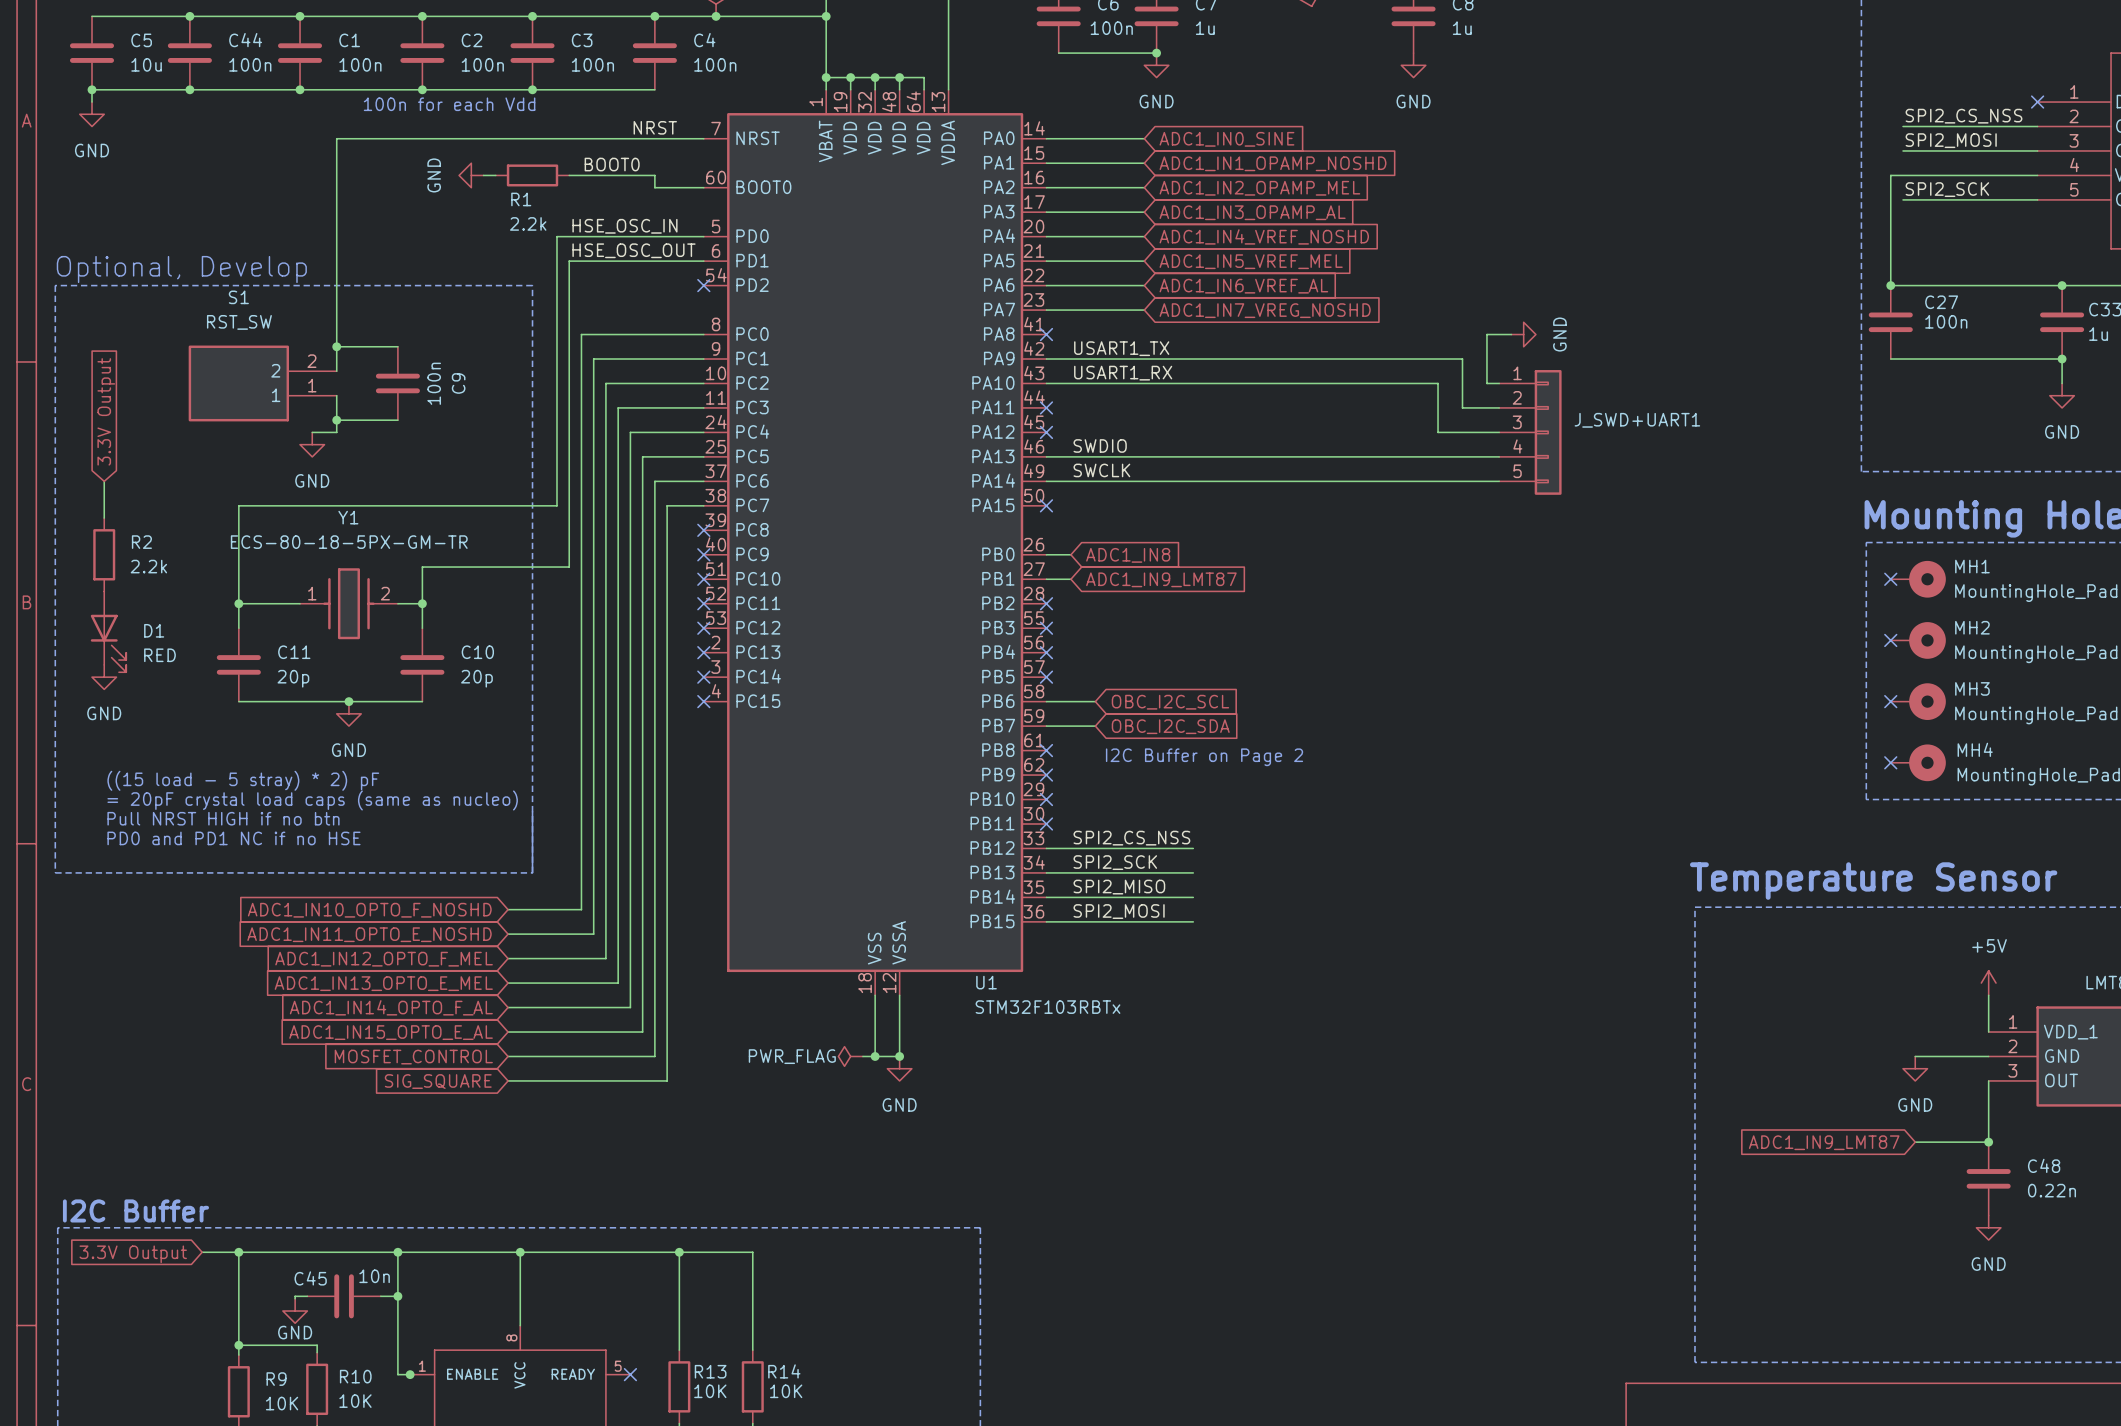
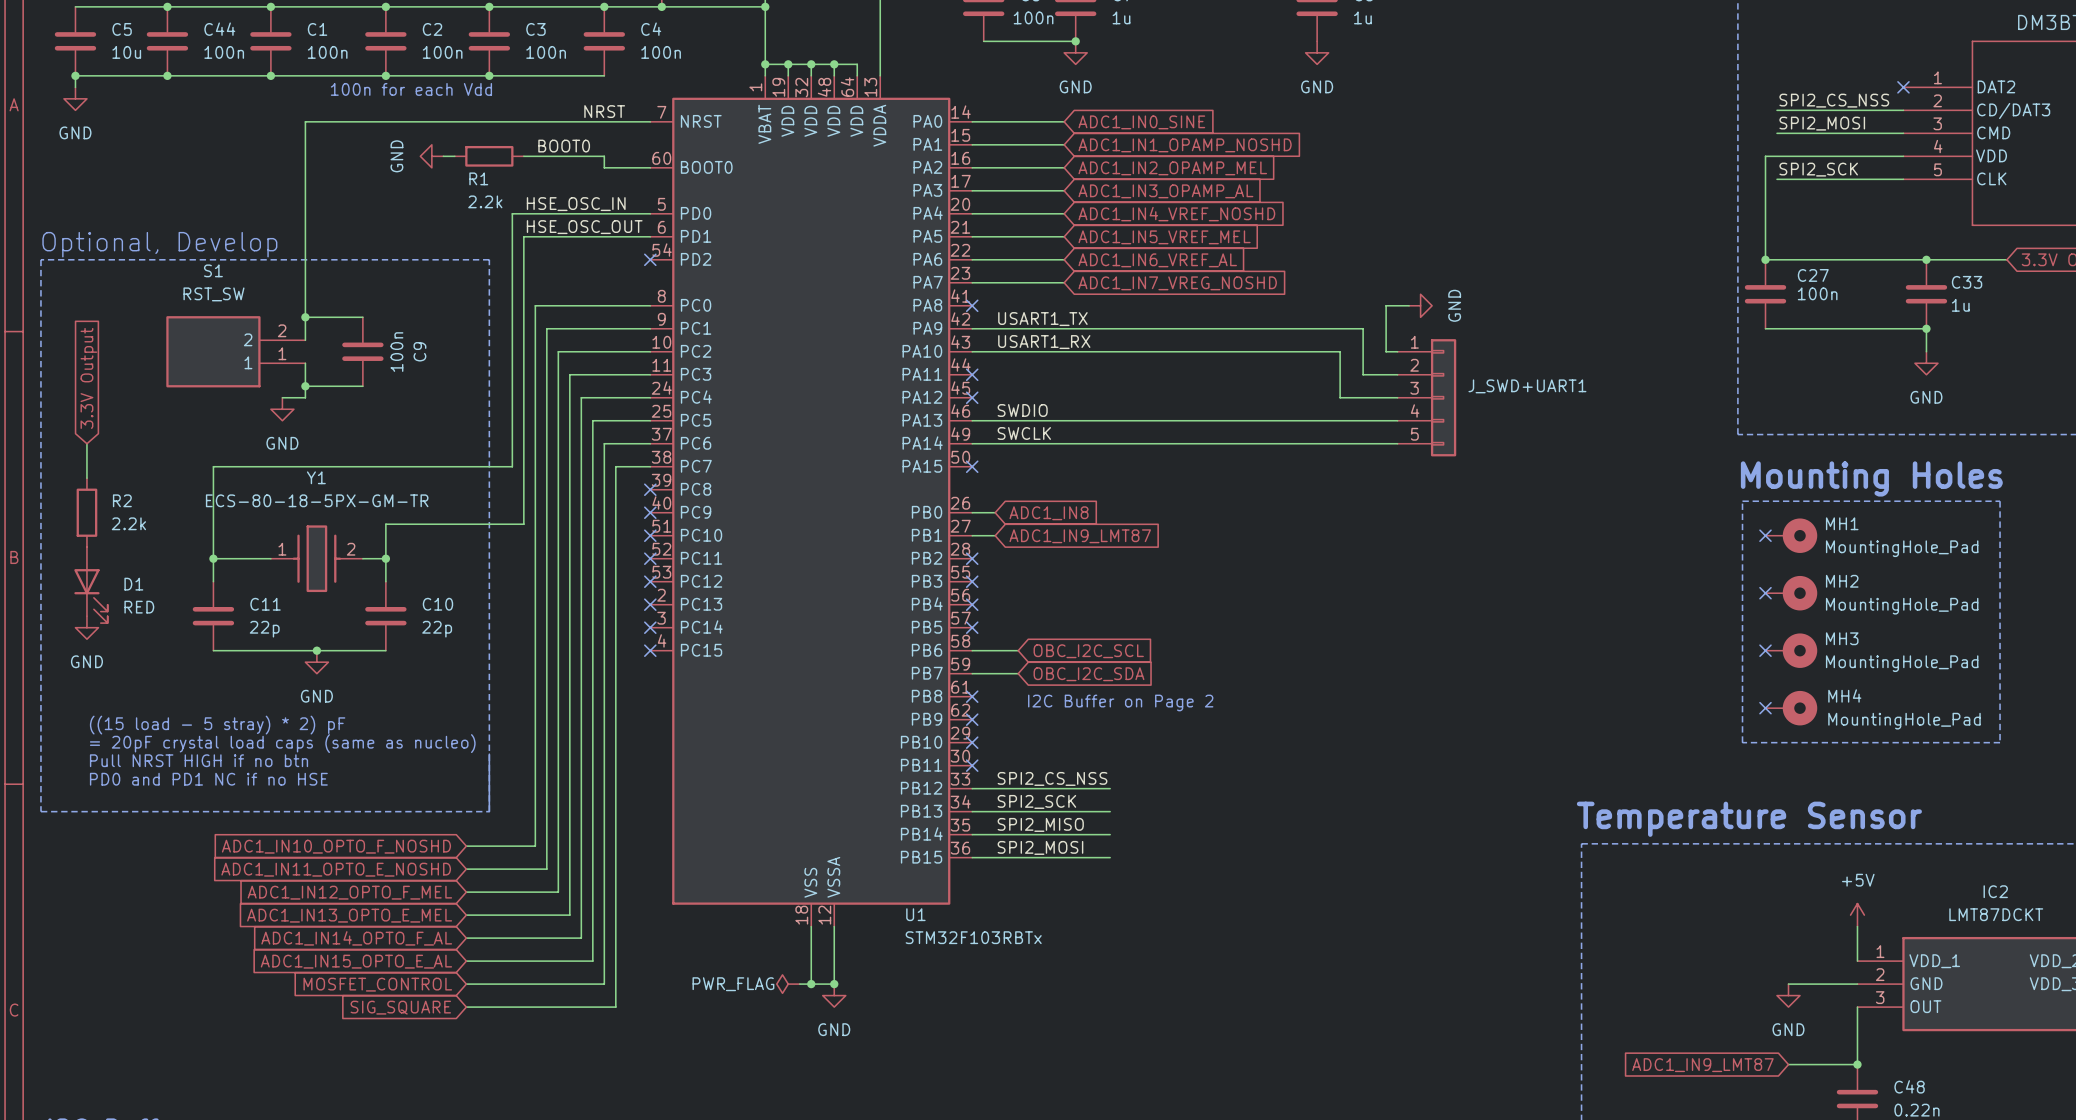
C11 value: 20p (293, 678) -> 22p (264, 629)
C10 value: 20p (476, 678) -> 22p (437, 629)

